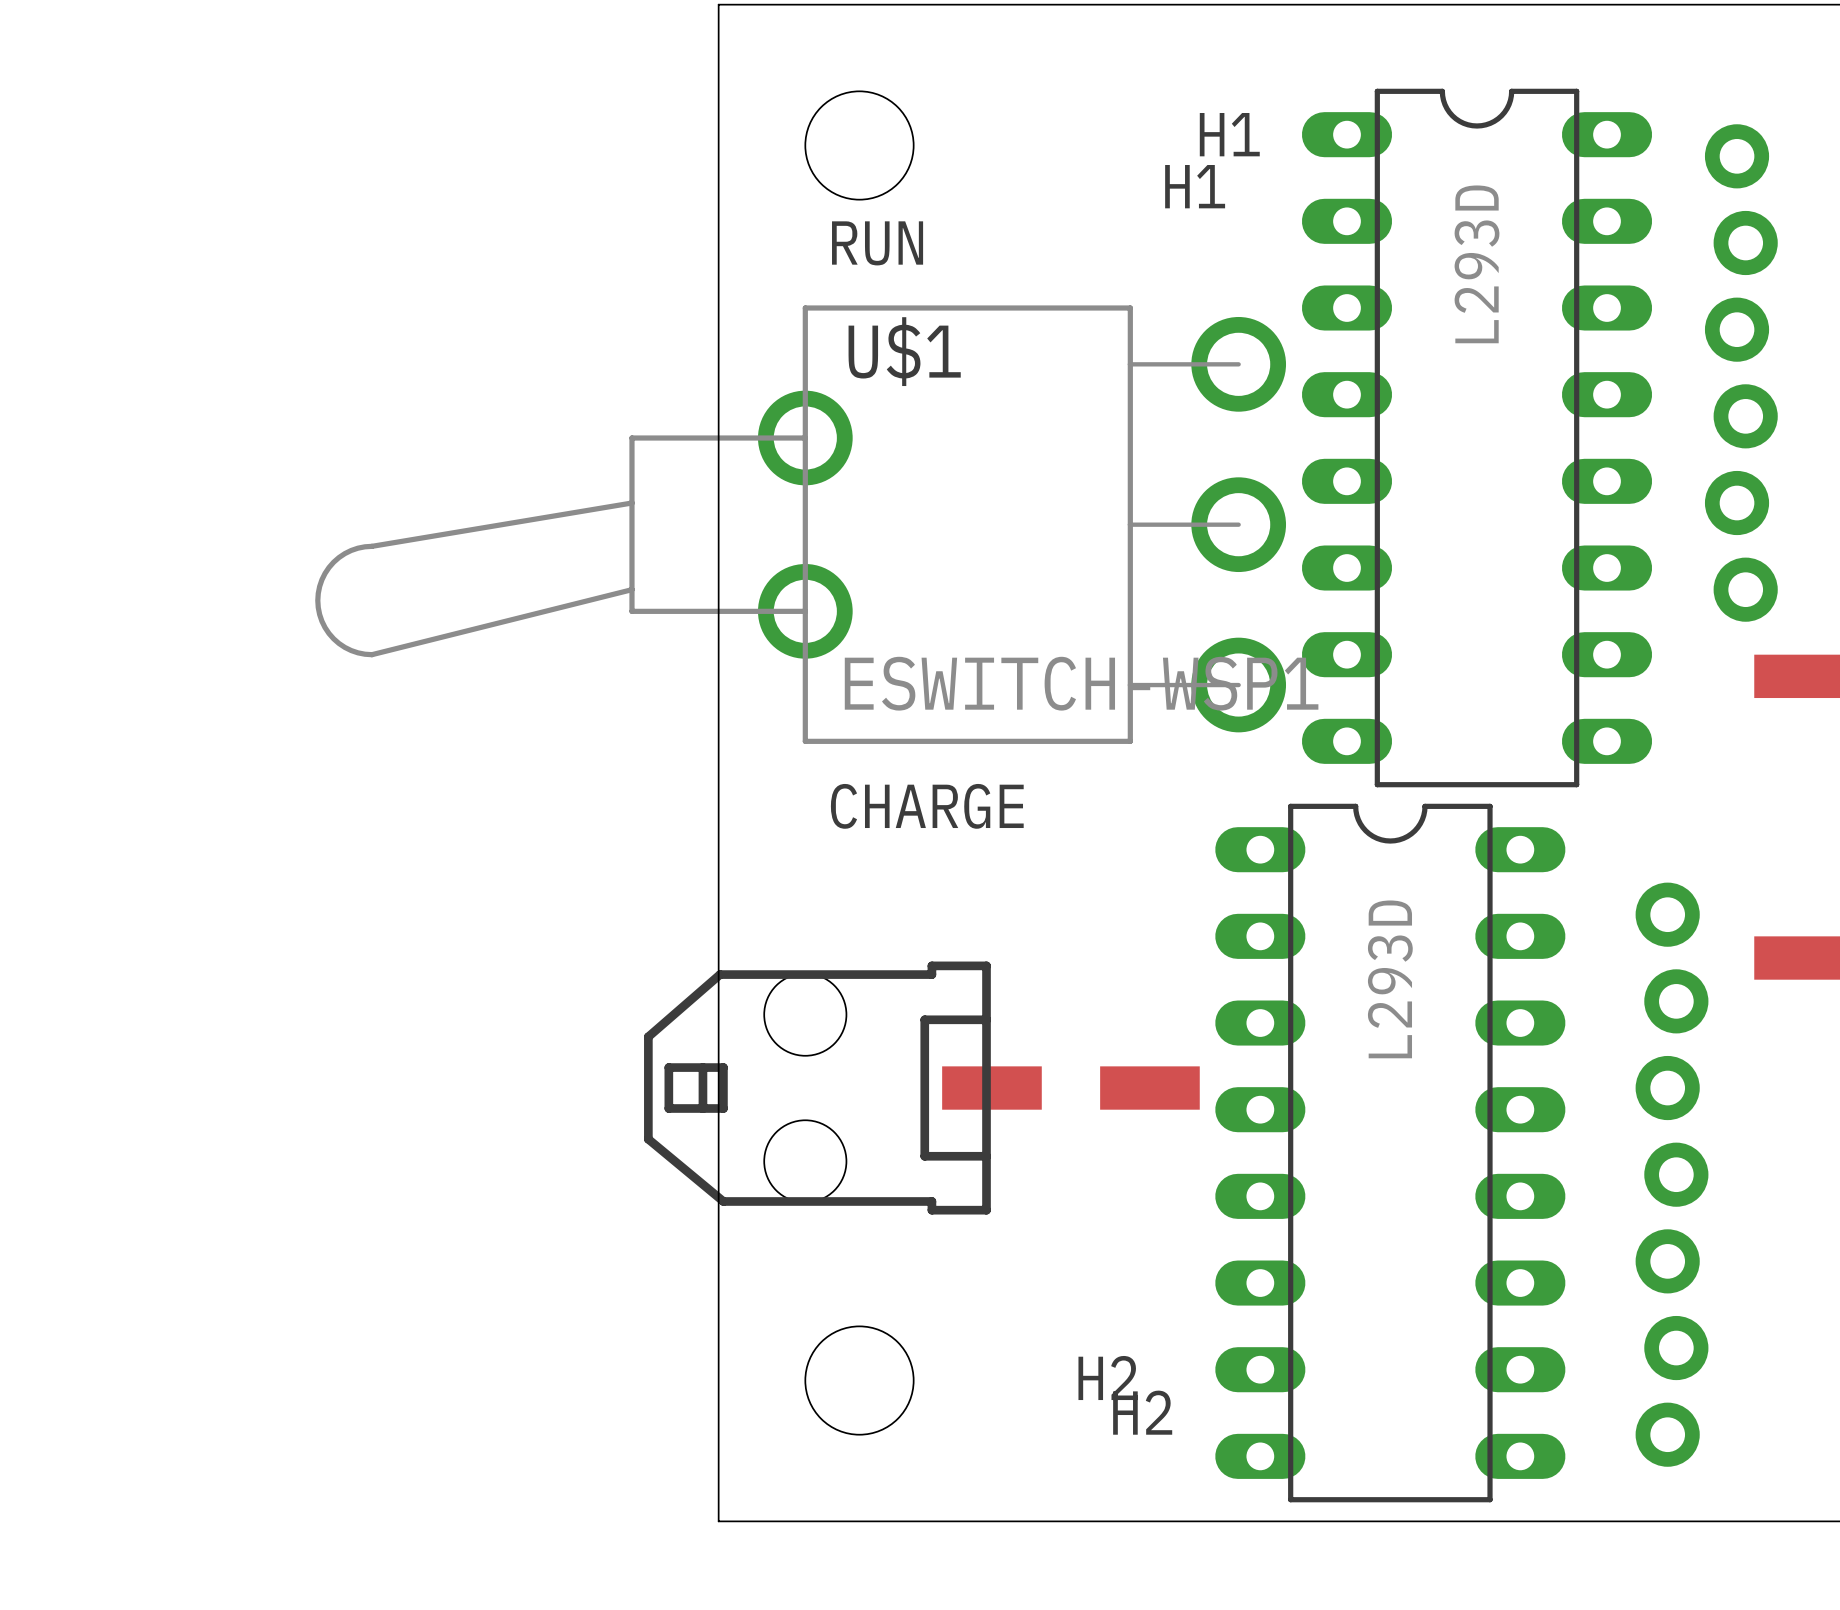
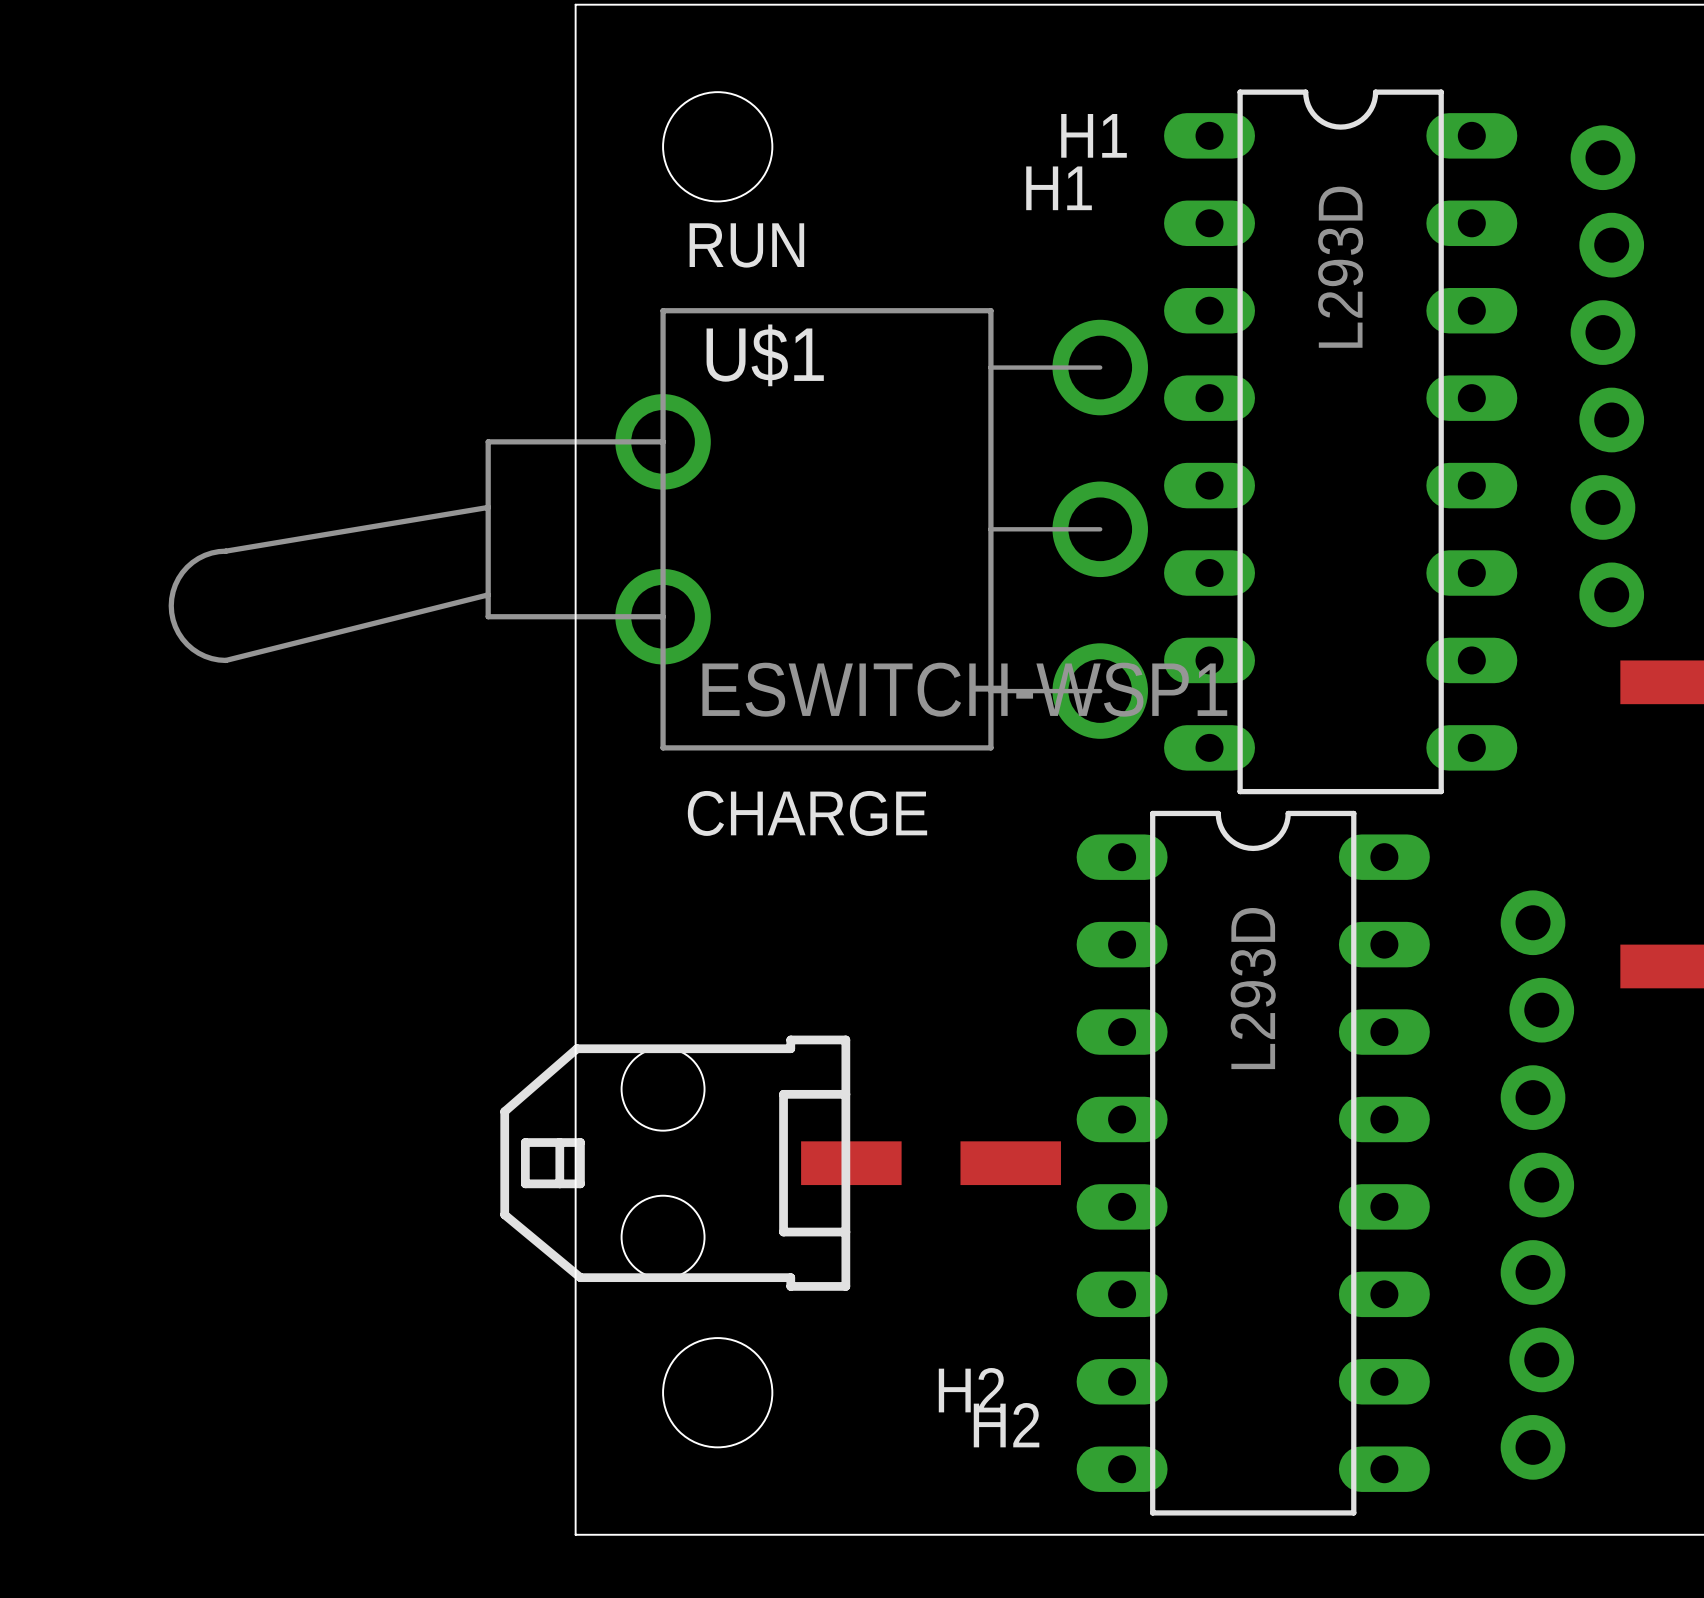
part position: (921, 1088) -> (780, 1163)

